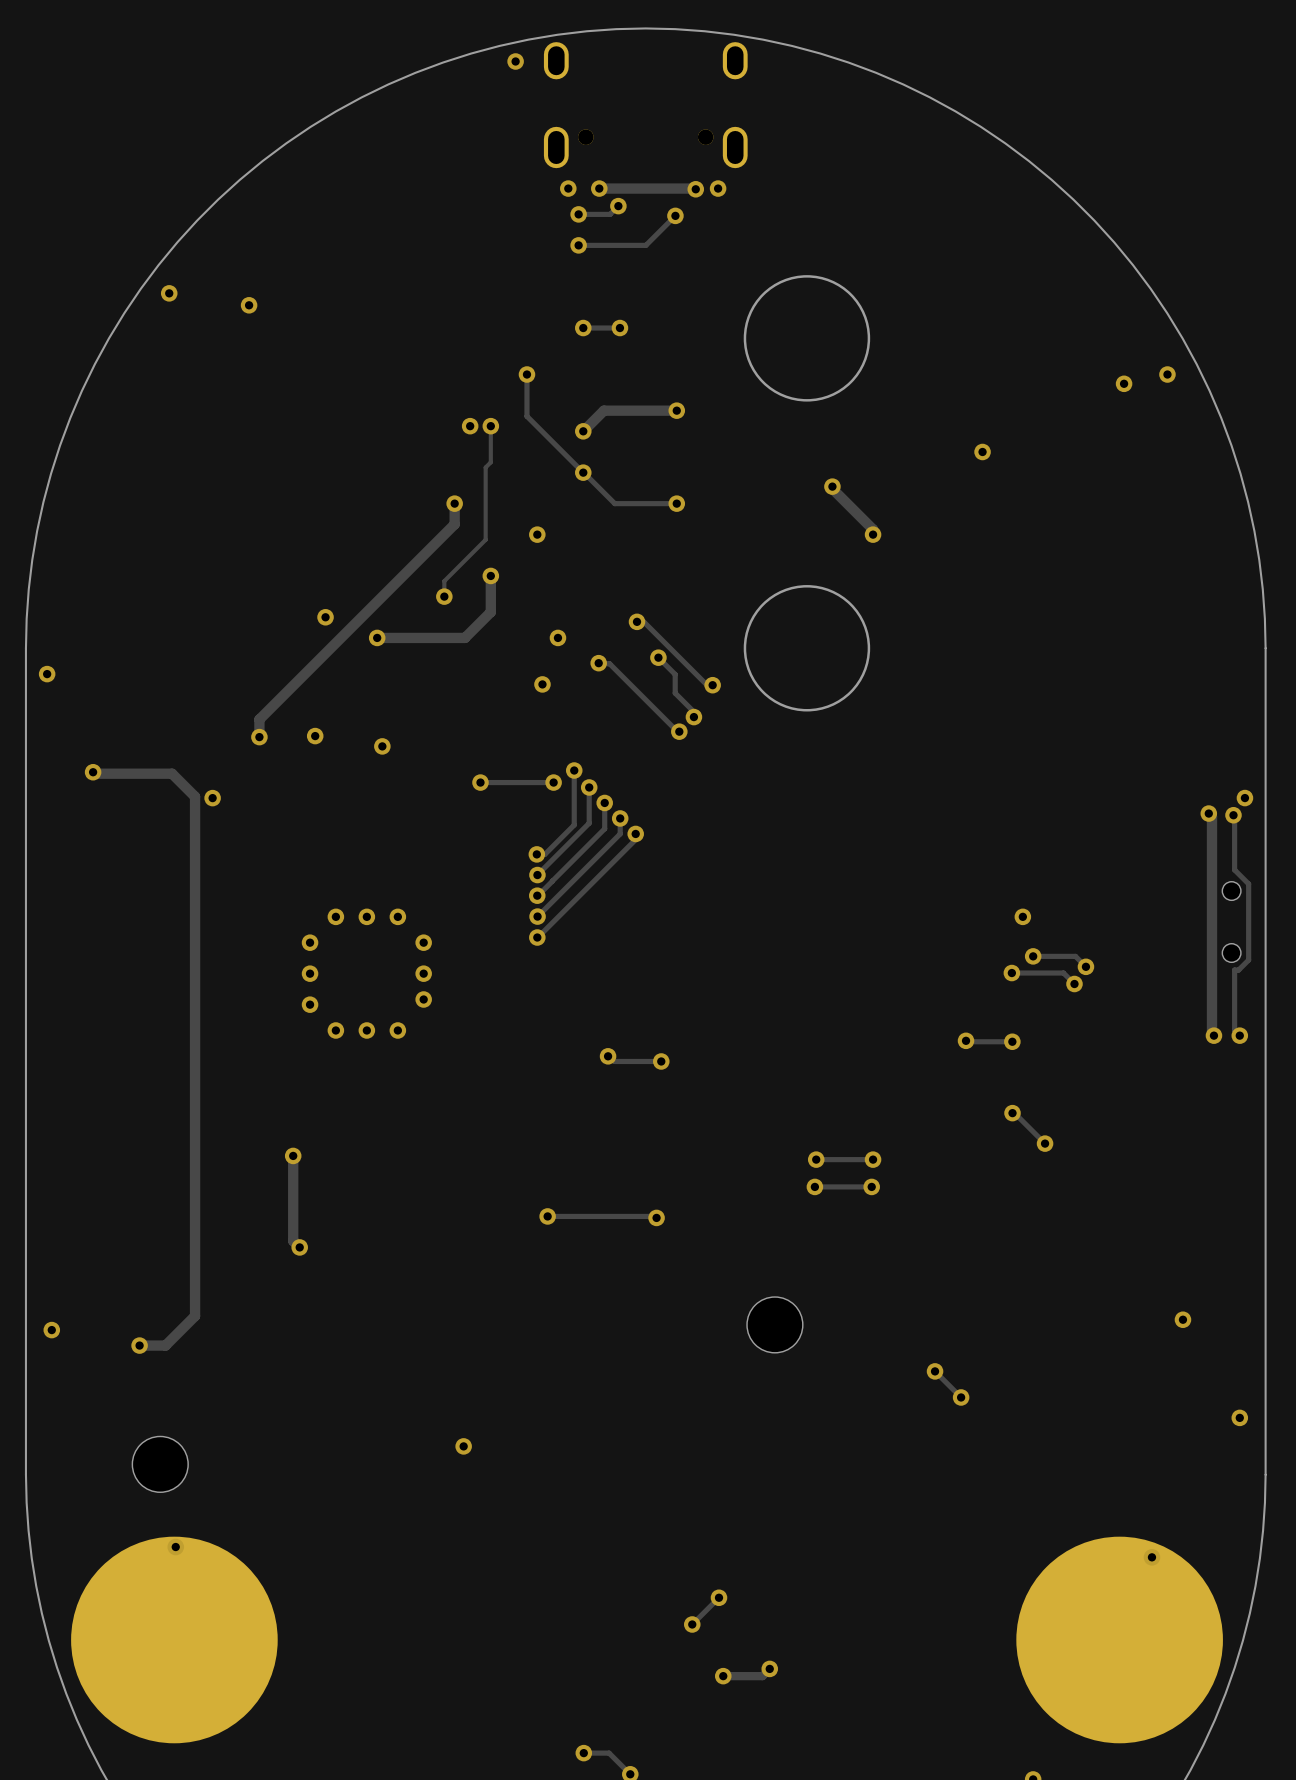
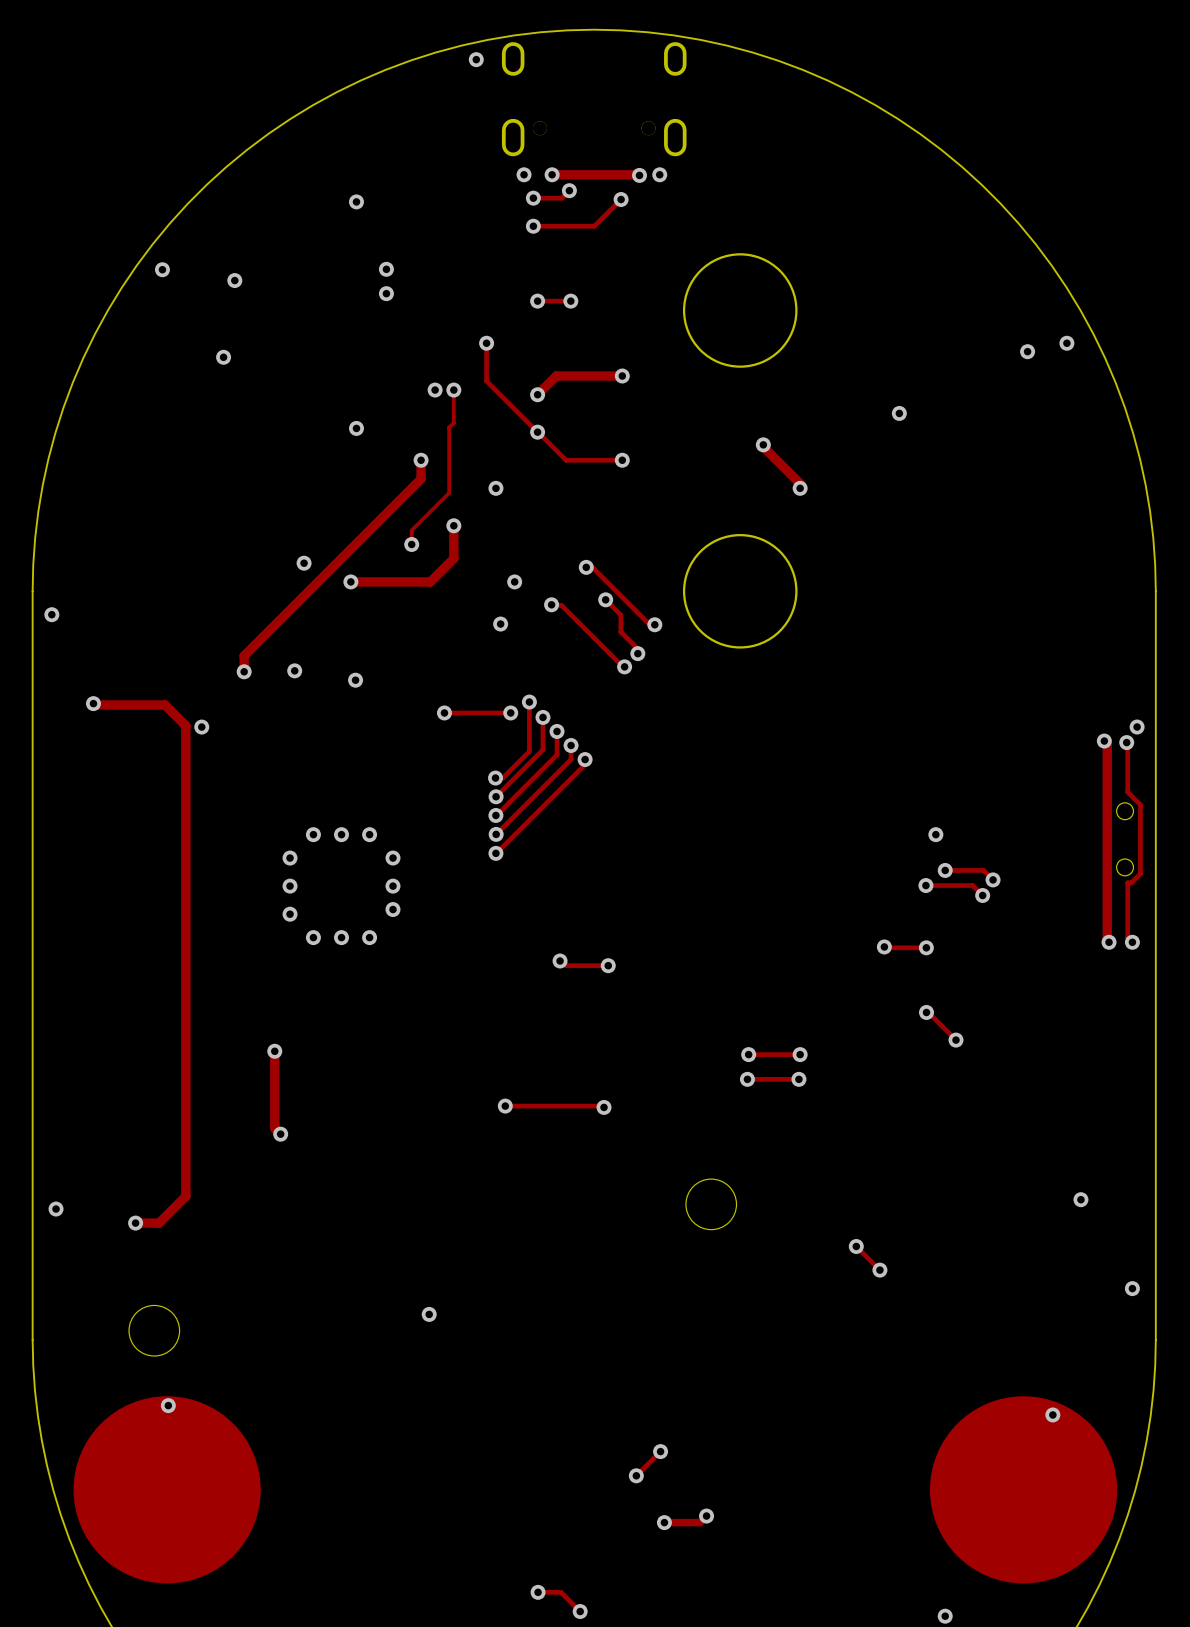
via: none -> (356, 201)
via: none -> (386, 269)
via: none -> (386, 293)
via: none -> (223, 357)
via: none -> (356, 428)

